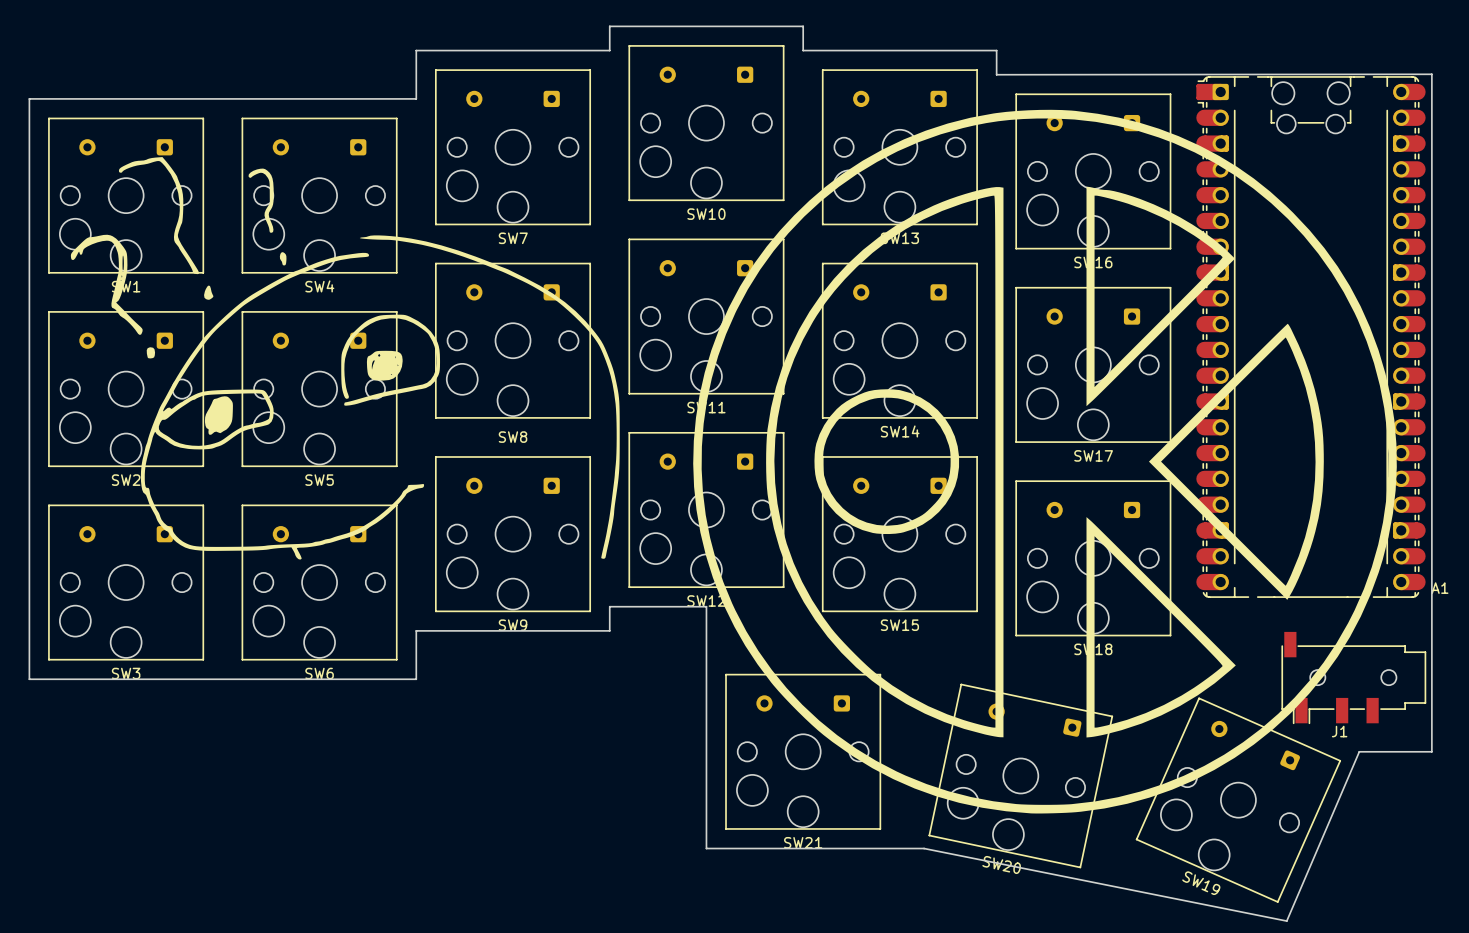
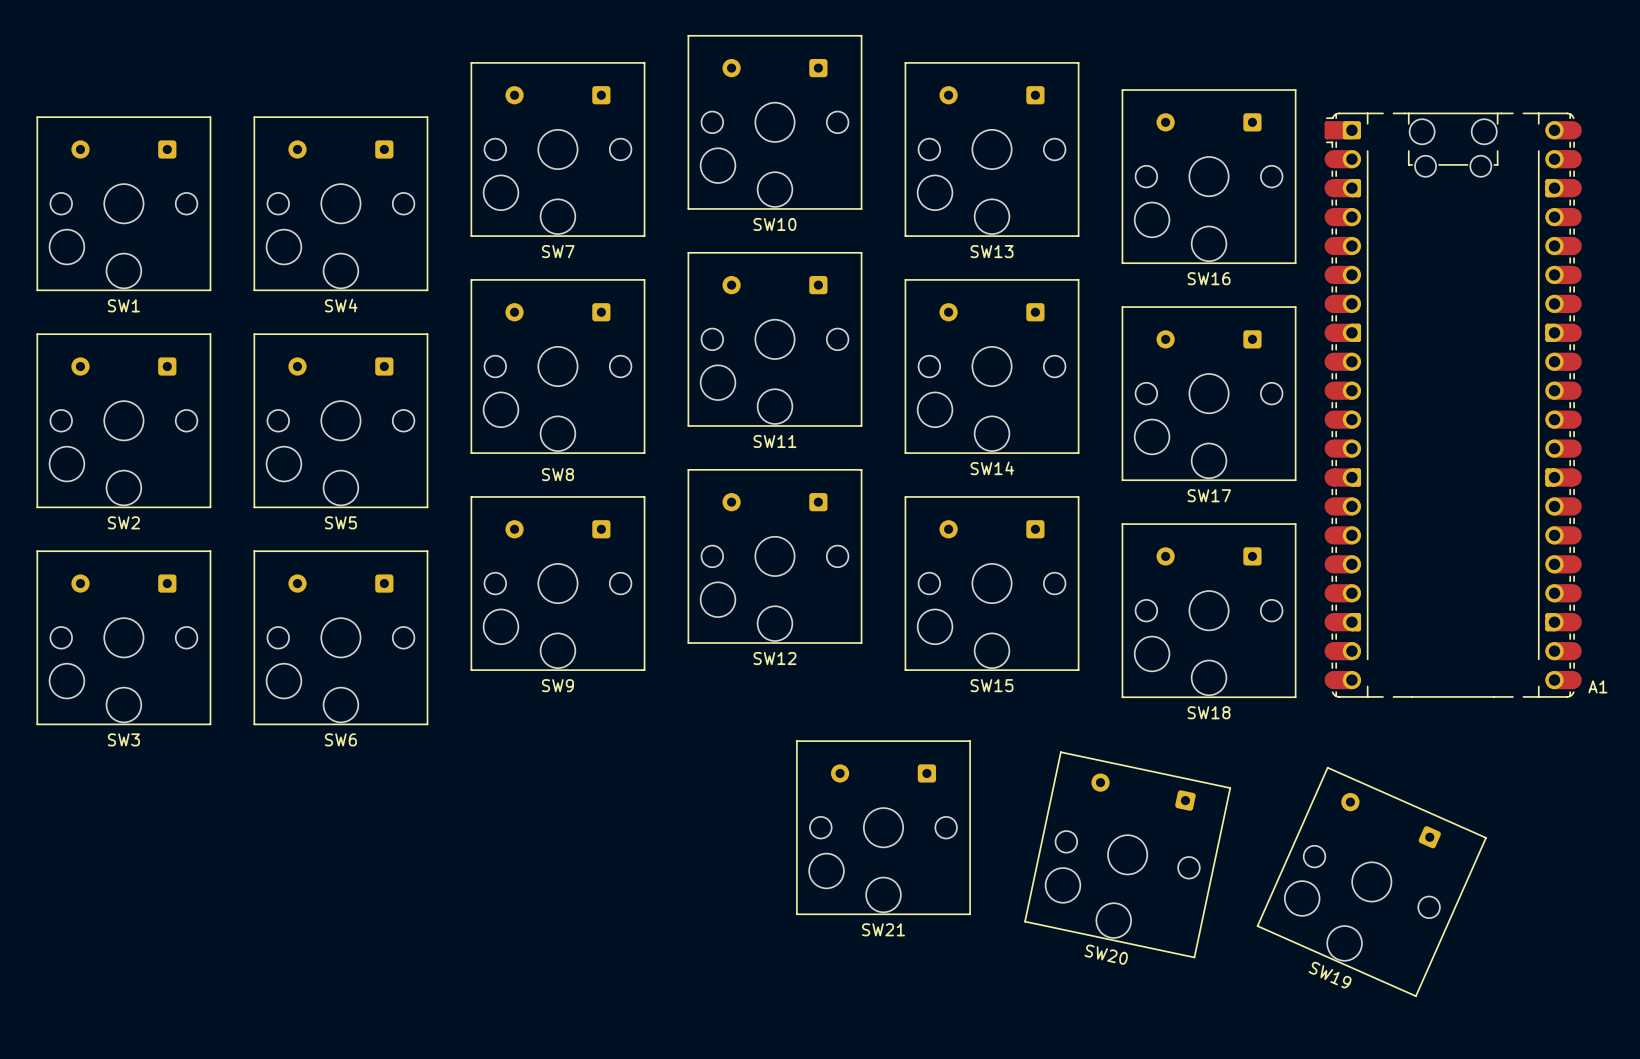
board edge: (609, 26) (803, 26) (803, 50) (996, 50) (996, 74) (1431, 74) (1431, 751) (1359, 751) (1286, 921) (924, 848) (706, 848) (706, 606) (609, 606) (609, 630) (416, 630) (416, 679) (29, 679) (29, 98) (416, 98) (416, 50) (609, 50) (609, 26) -> none
drawing: [693, 109, 1397, 814] -> none
drawing: [70, 157, 620, 560] -> none
A1 position: (1310, 337) -> (1453, 405)
J1: (1353, 677) -> none

